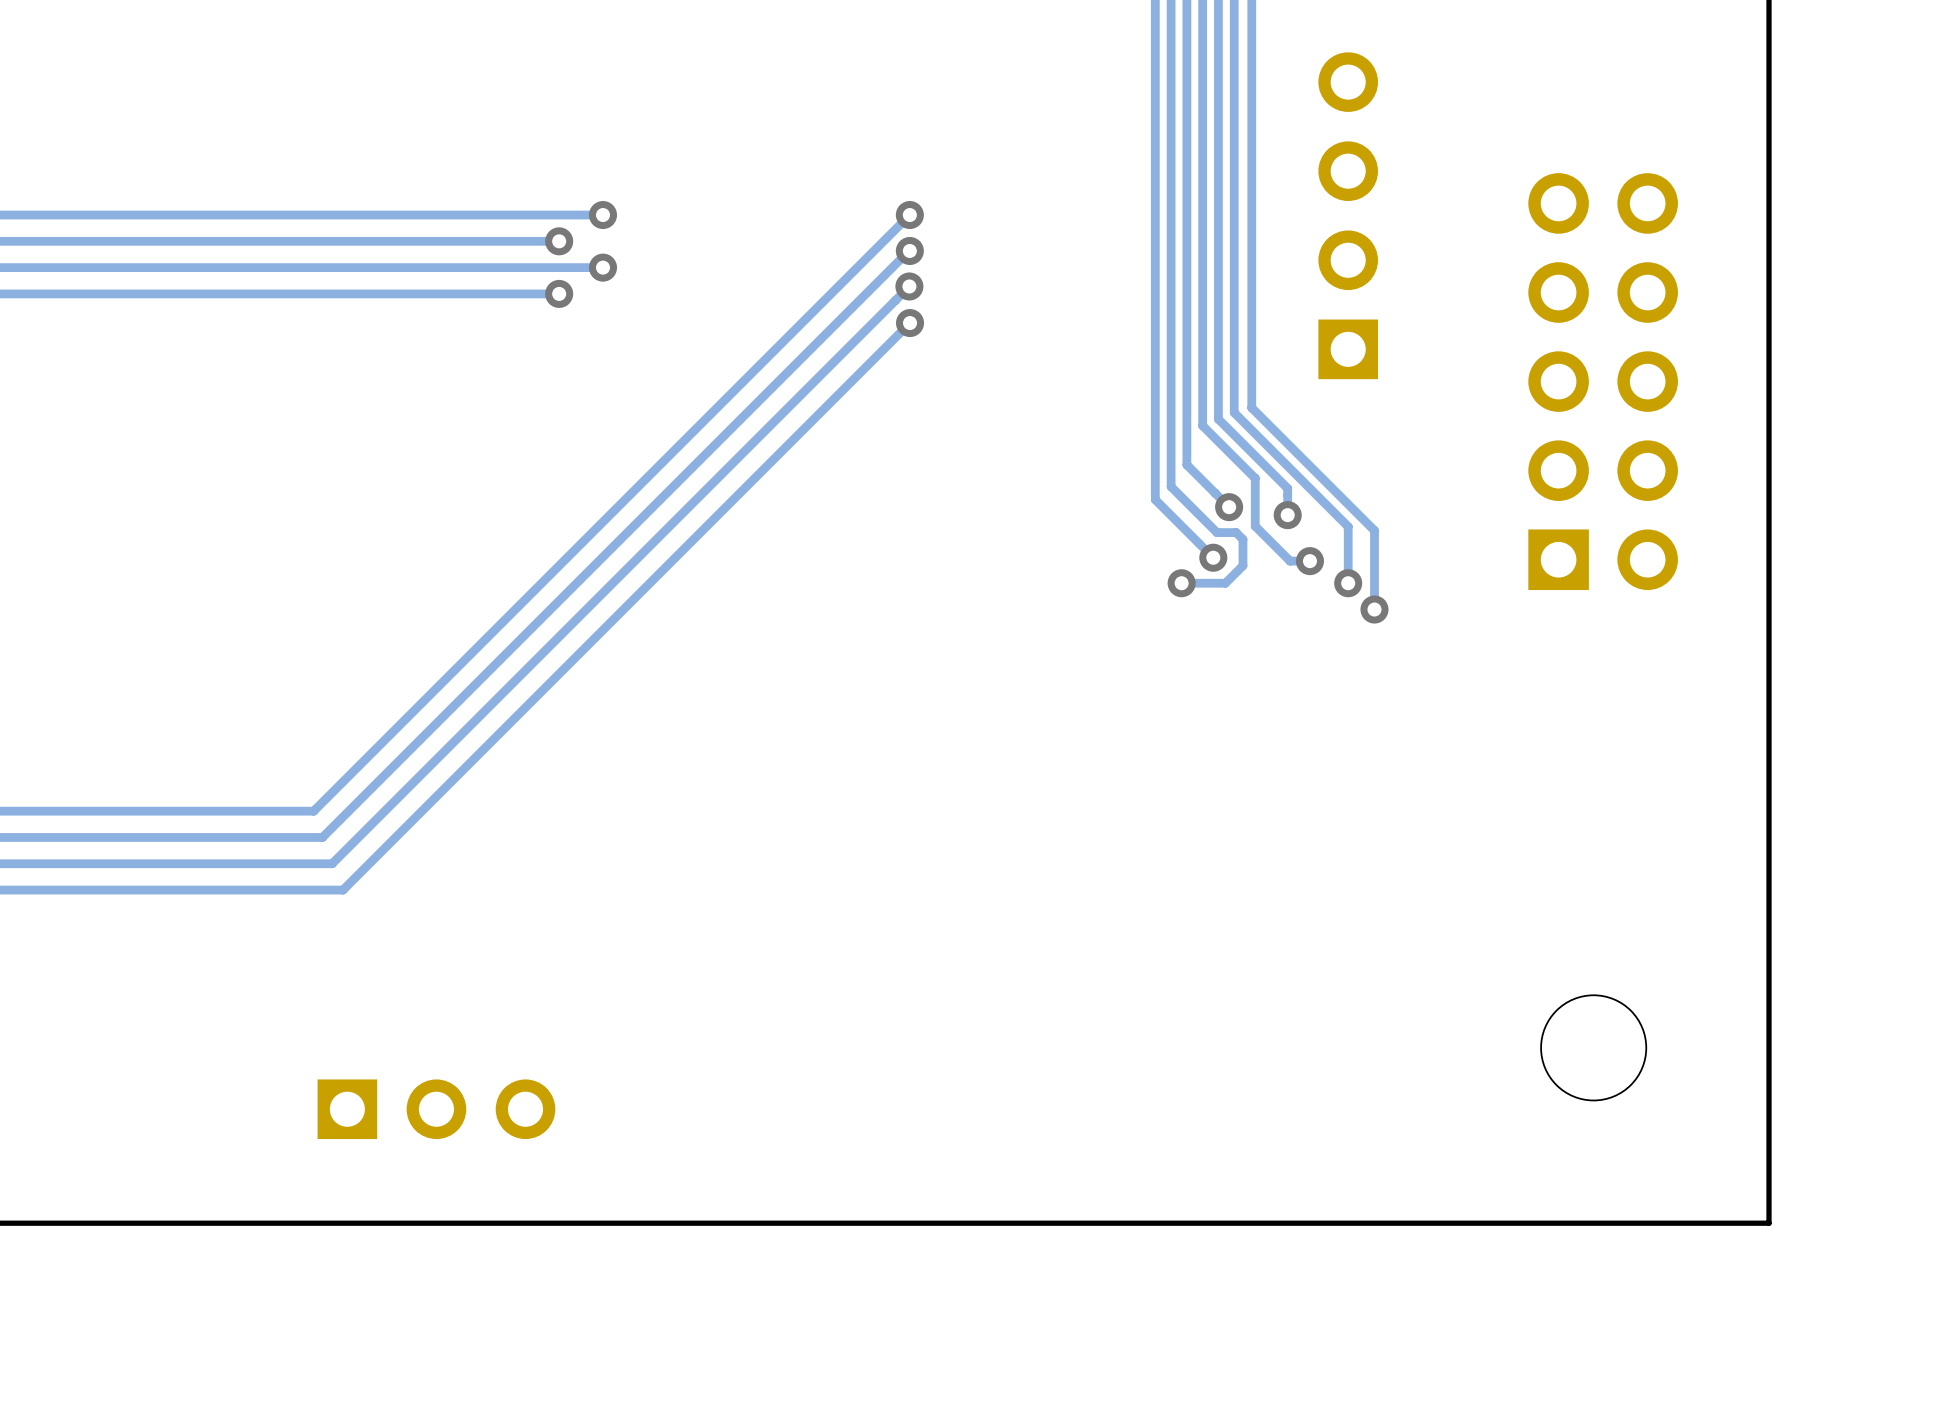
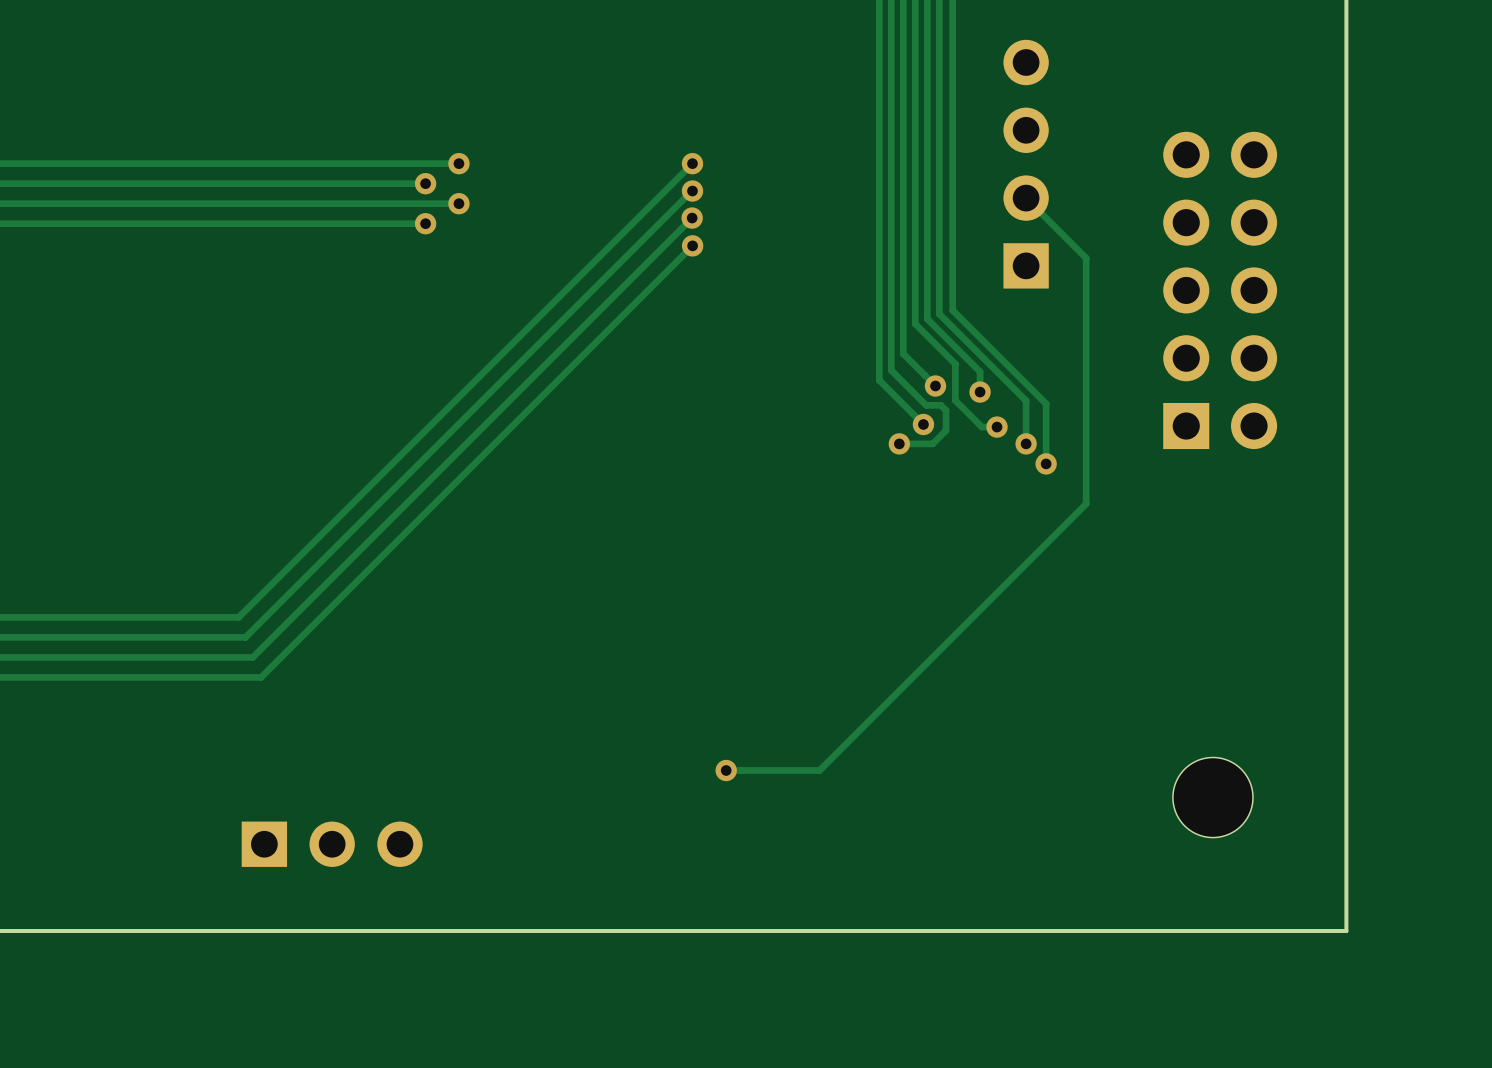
track: none -> (1026, 198) (1086, 258) (1086, 503) (819, 770) (726, 770)
via: none -> (726, 770)

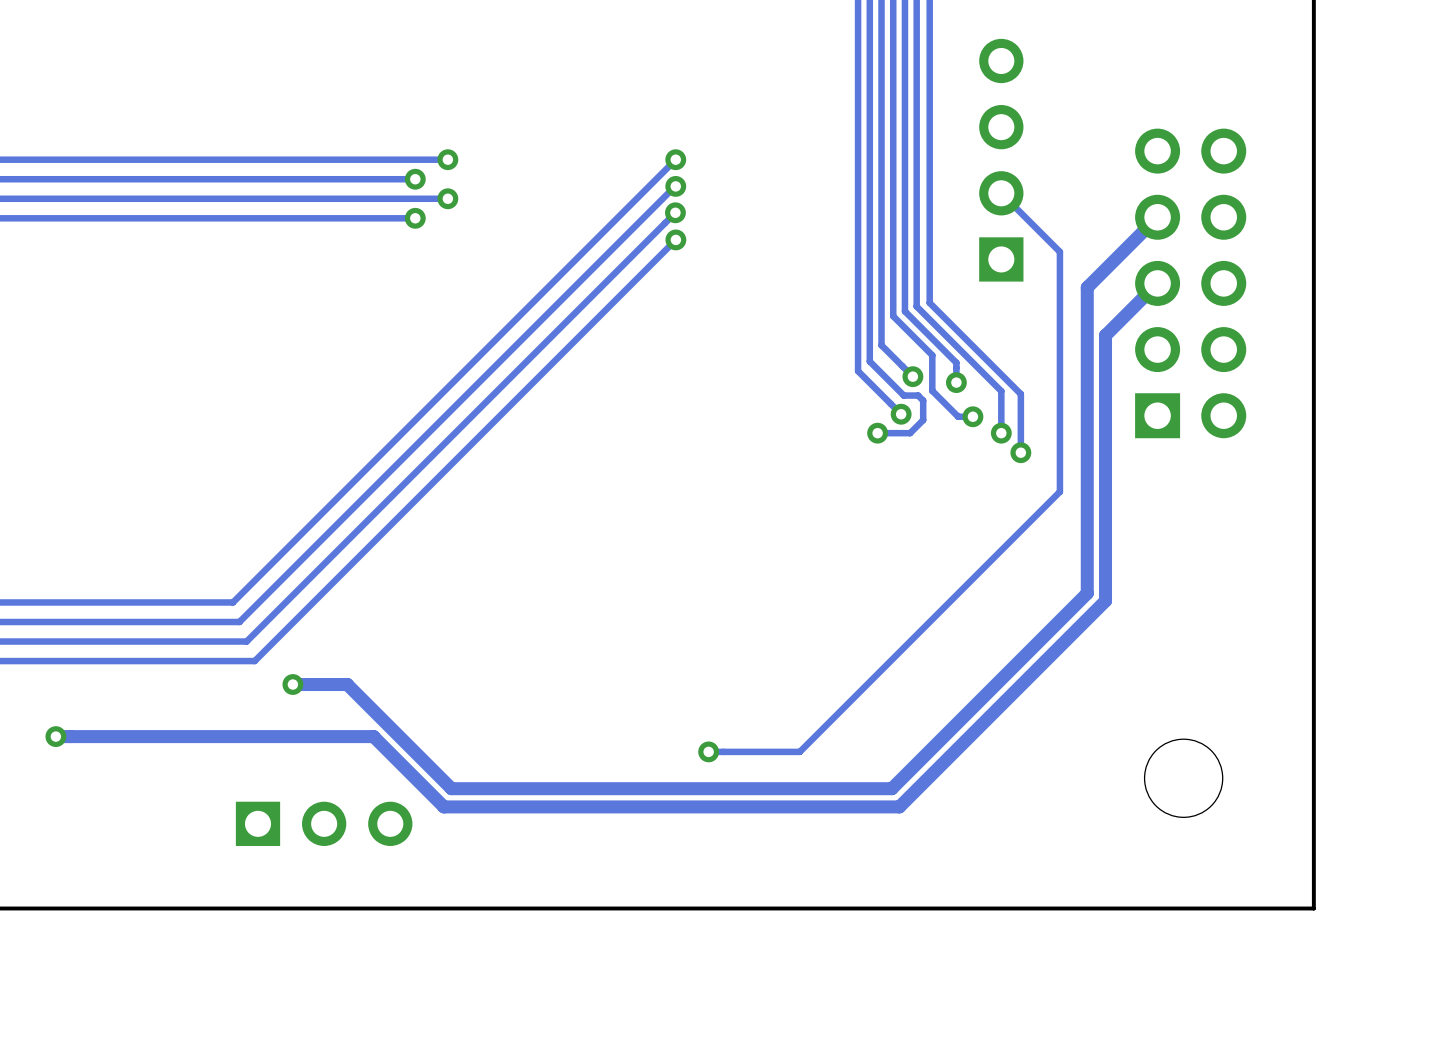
track: none -> (1157, 217) (1087, 287) (1087, 593) (891, 788) (451, 788) (347, 684) (292, 684)
track: none -> (1157, 283) (1105, 335) (1105, 600) (899, 806) (443, 806) (373, 736) (55, 736)
via: none -> (292, 684)
via: none -> (55, 736)

